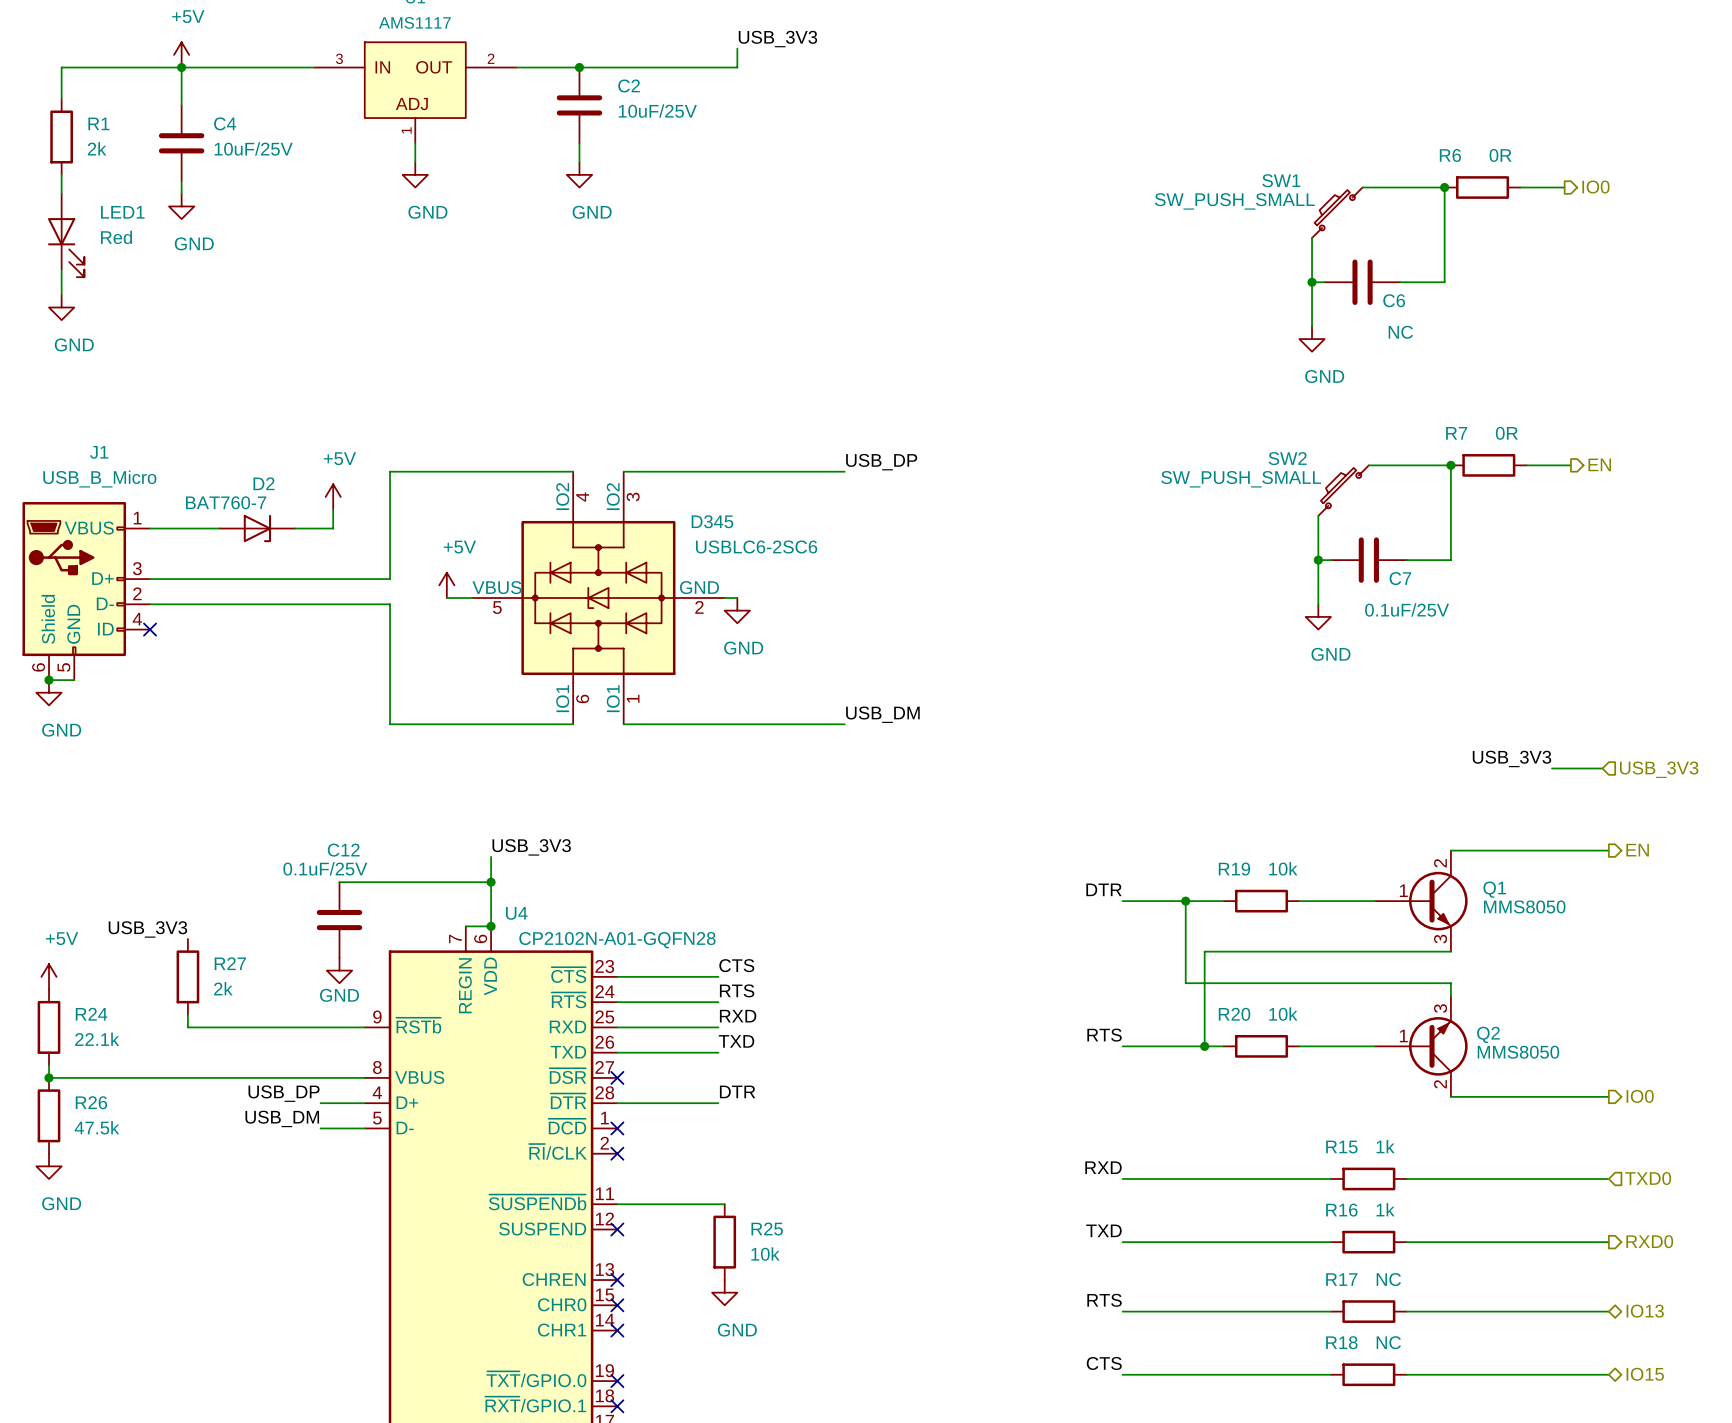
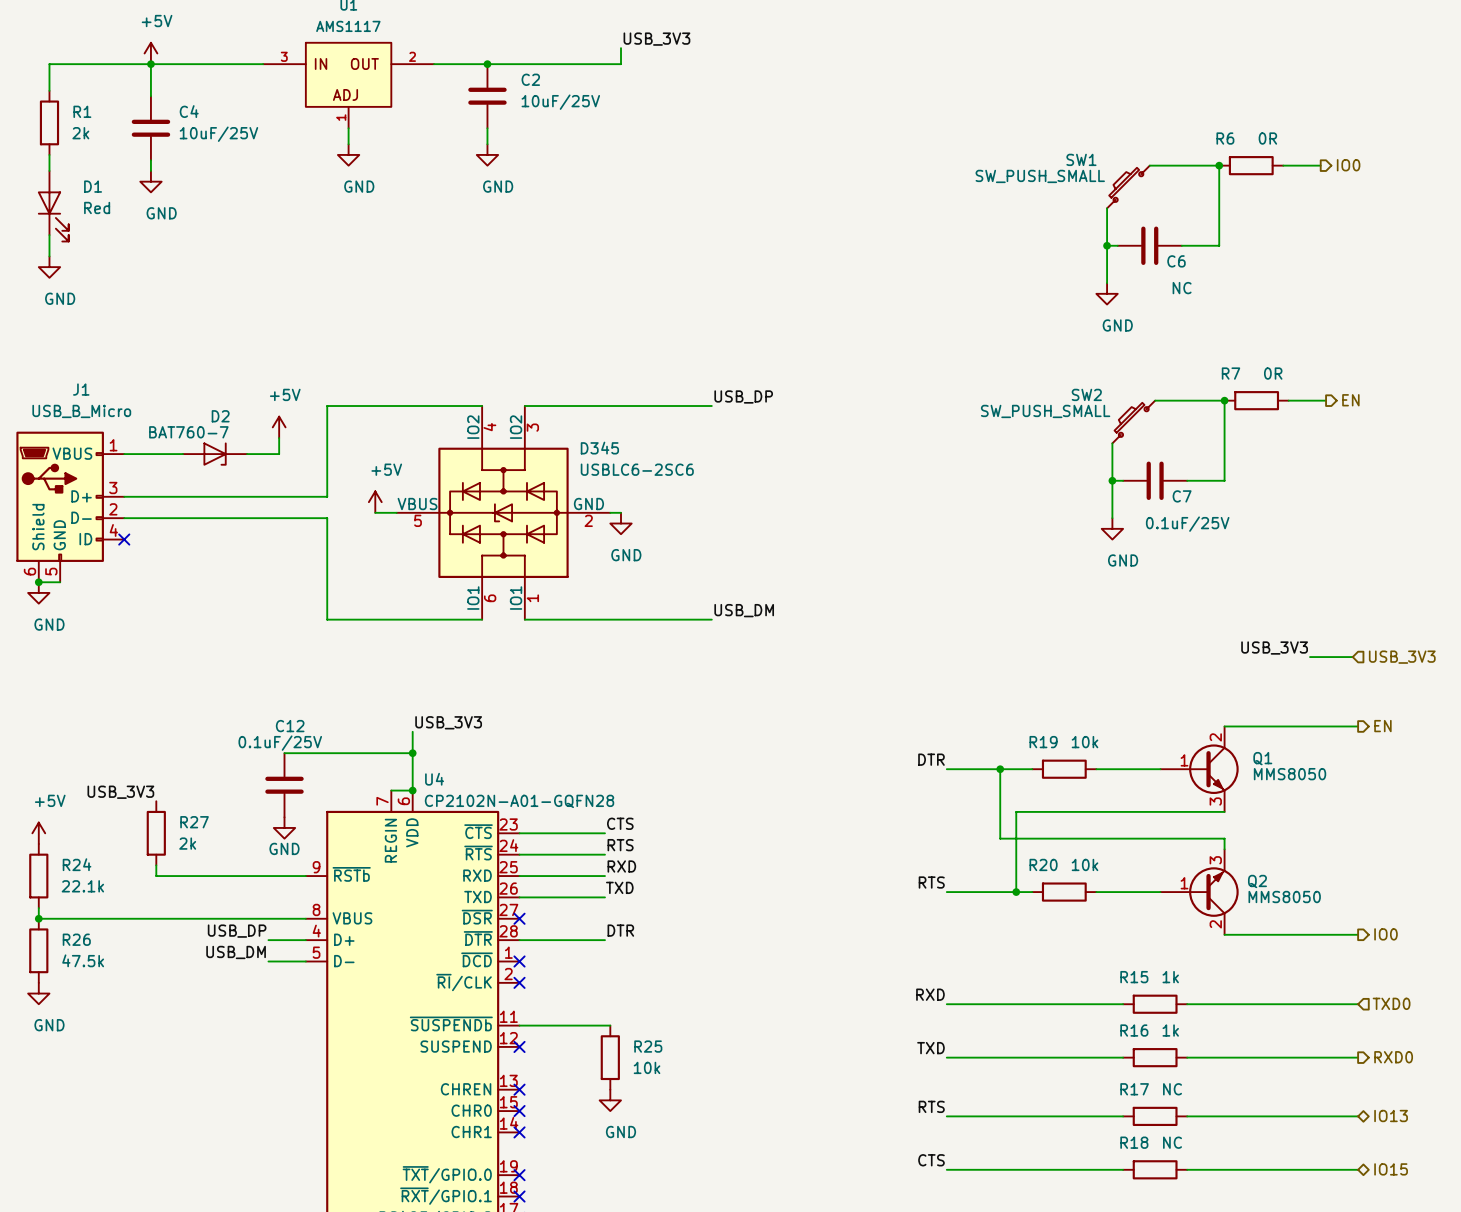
LED1 name: LED1 (122, 212) -> D1 (93, 186)

